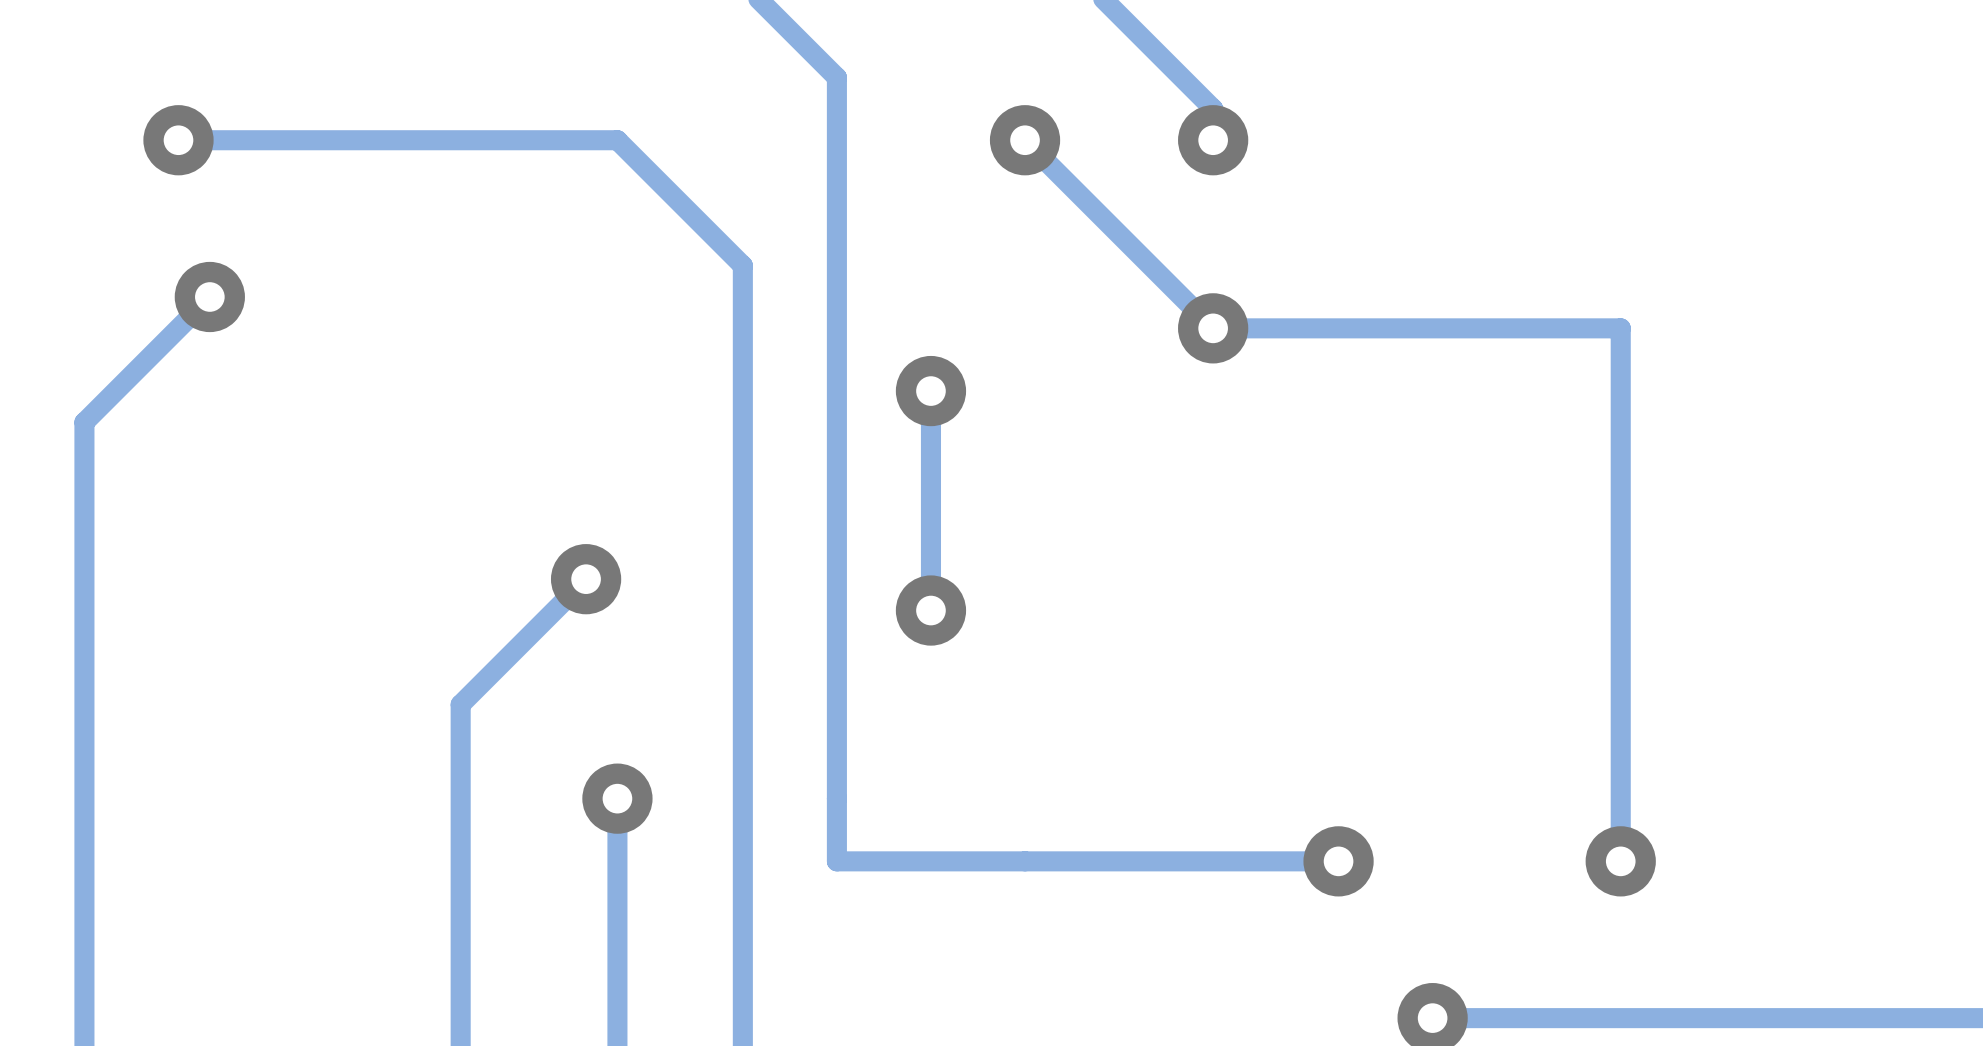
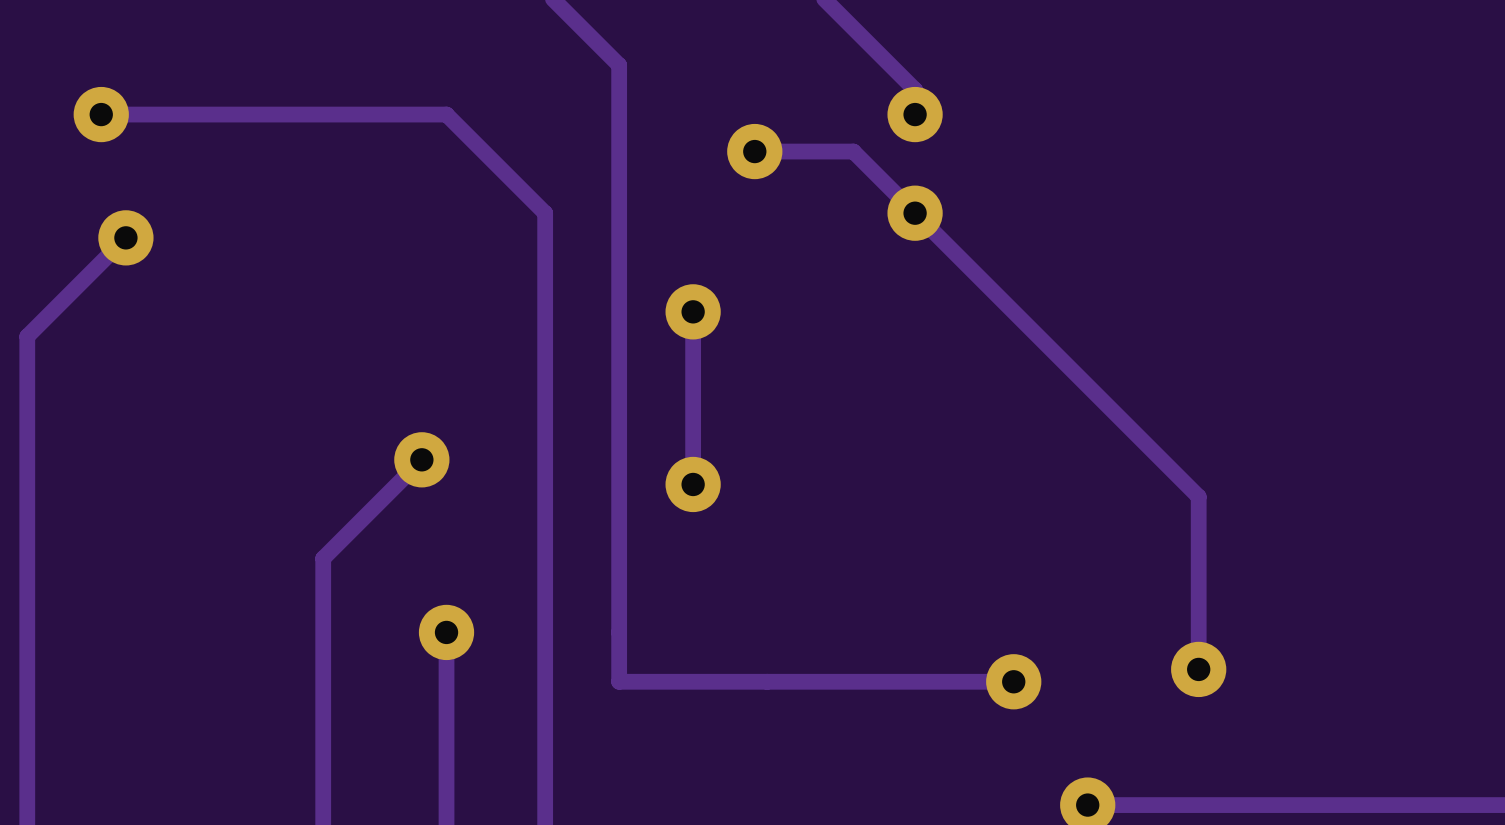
track: (1025, 140) (1213, 328) (1620, 328) (1620, 861) -> none
via position: (1025, 140) -> (754, 151)
track: none -> (754, 151) (853, 151) (1198, 496) (1198, 669)
via position: (1213, 328) -> (915, 213)
via position: (1620, 861) -> (1198, 669)

